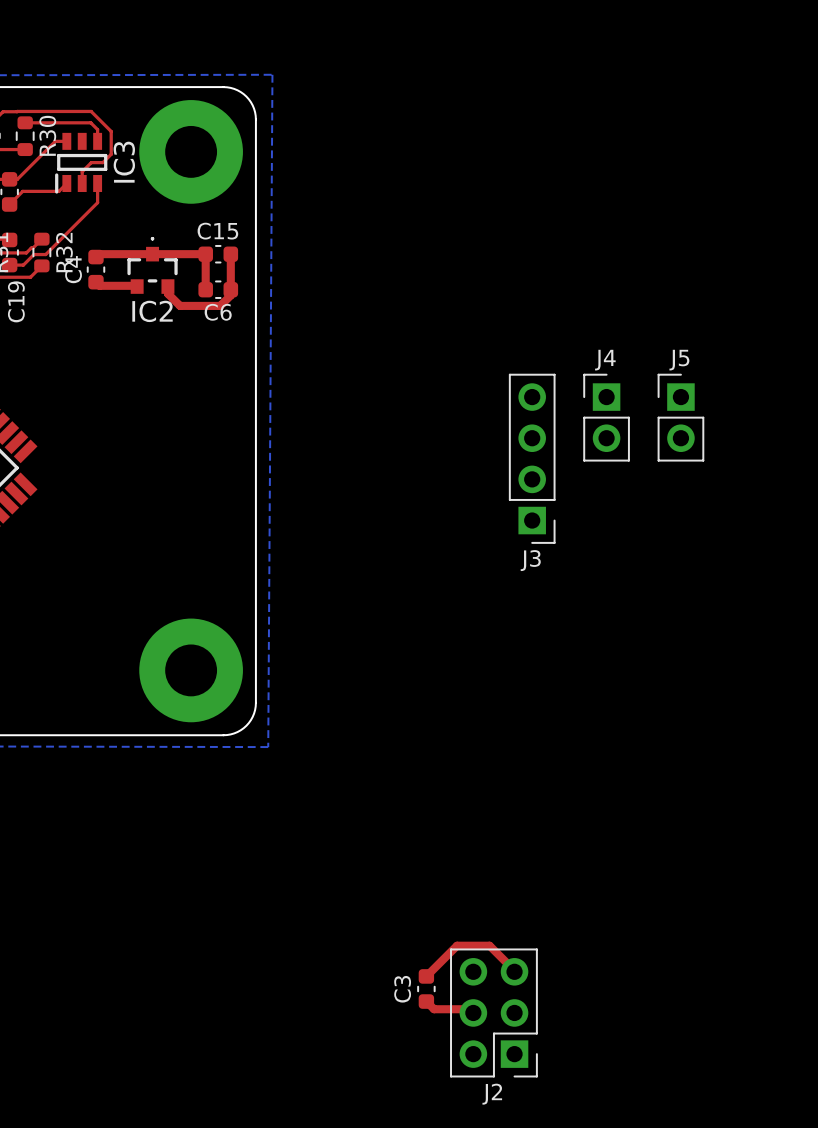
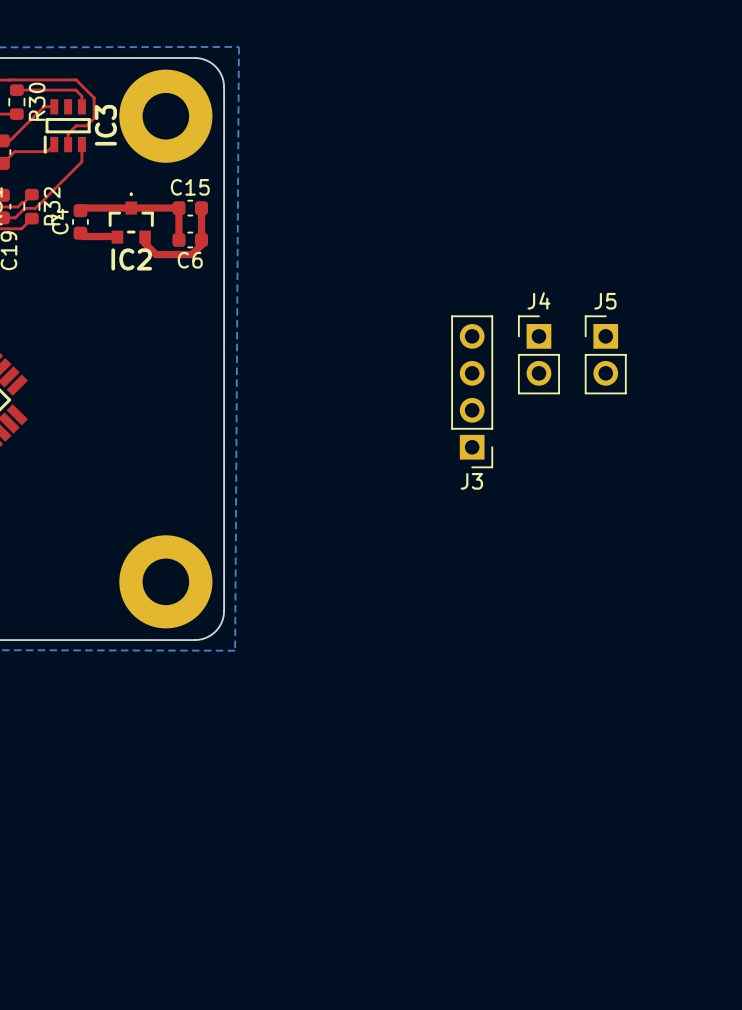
top track: (514, 971) (489, 945) (457, 945) (426, 976) -> none
C3: (426, 988) -> none
top track: (426, 1001) (434, 1009) (469, 1009) (473, 1012) -> none
J2: (493, 1012) -> none

